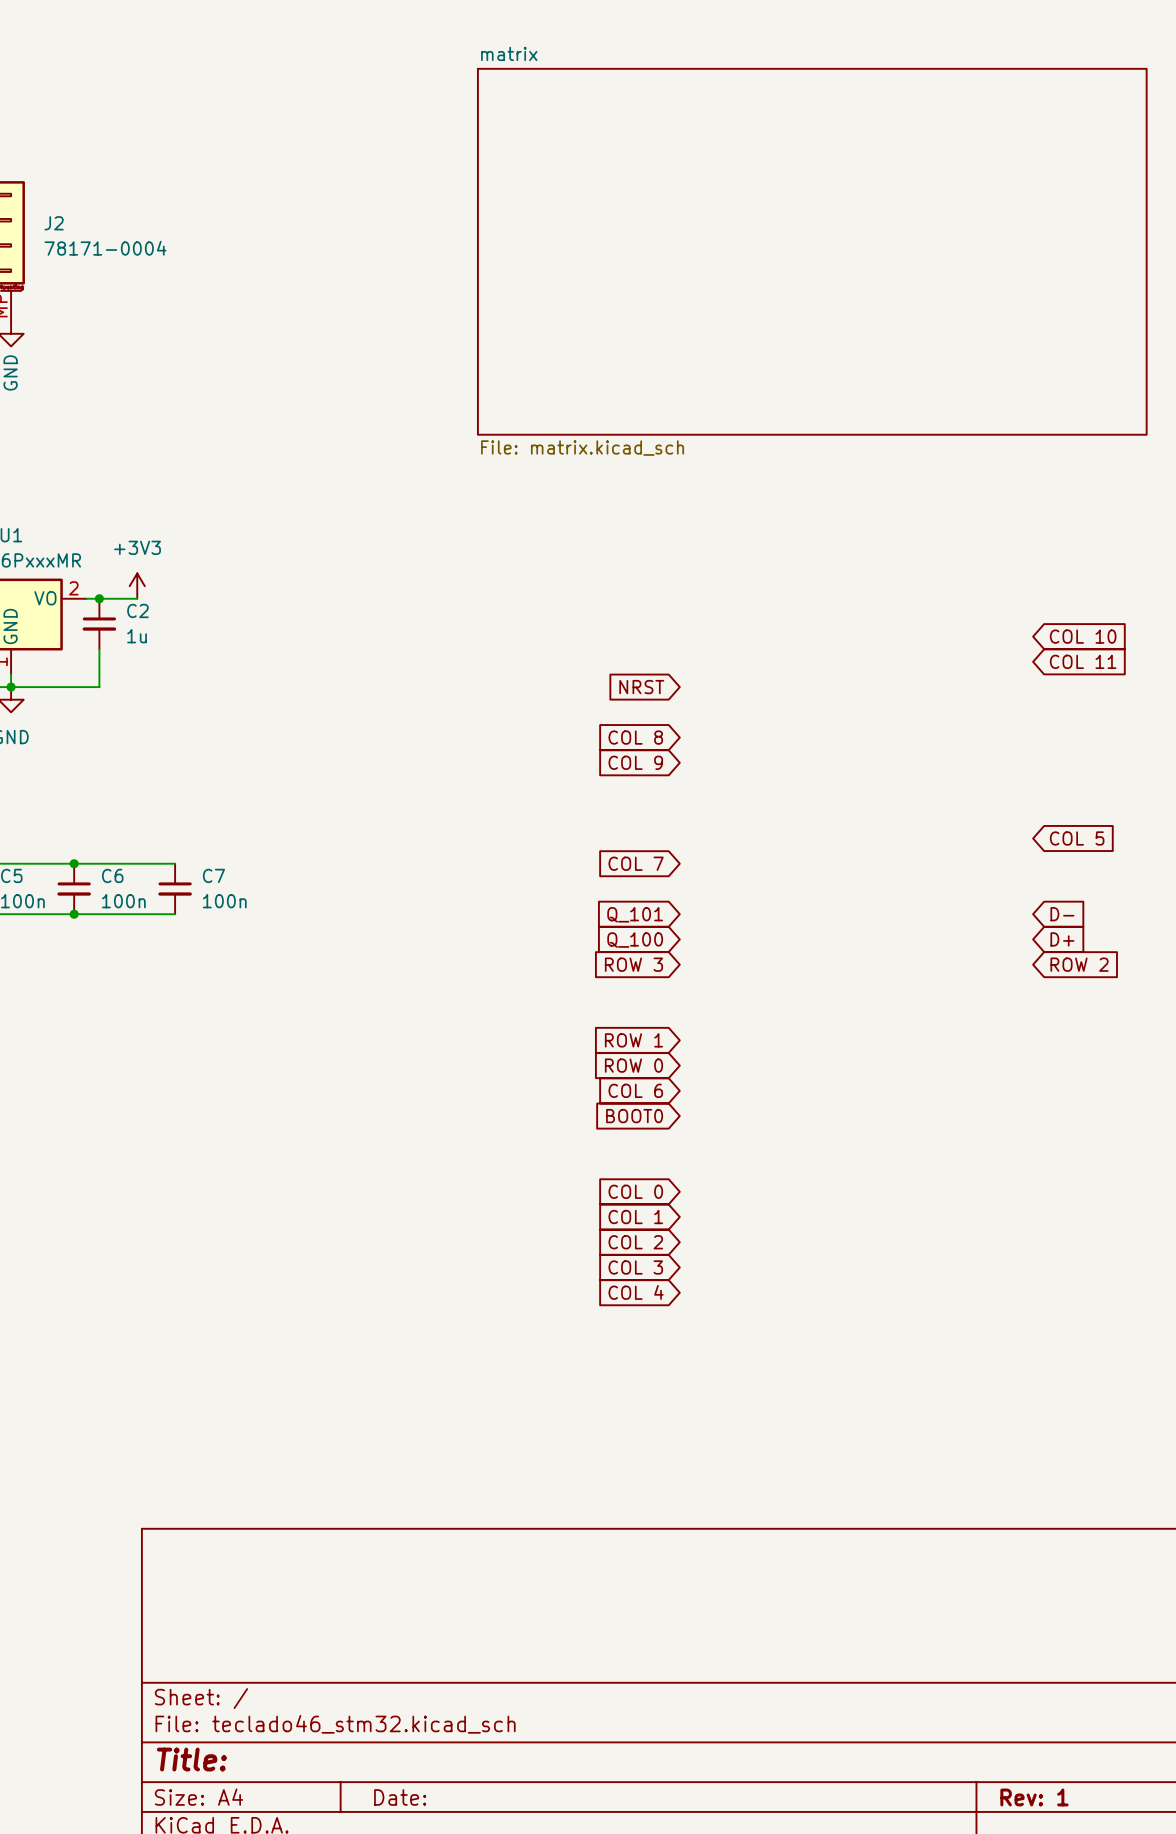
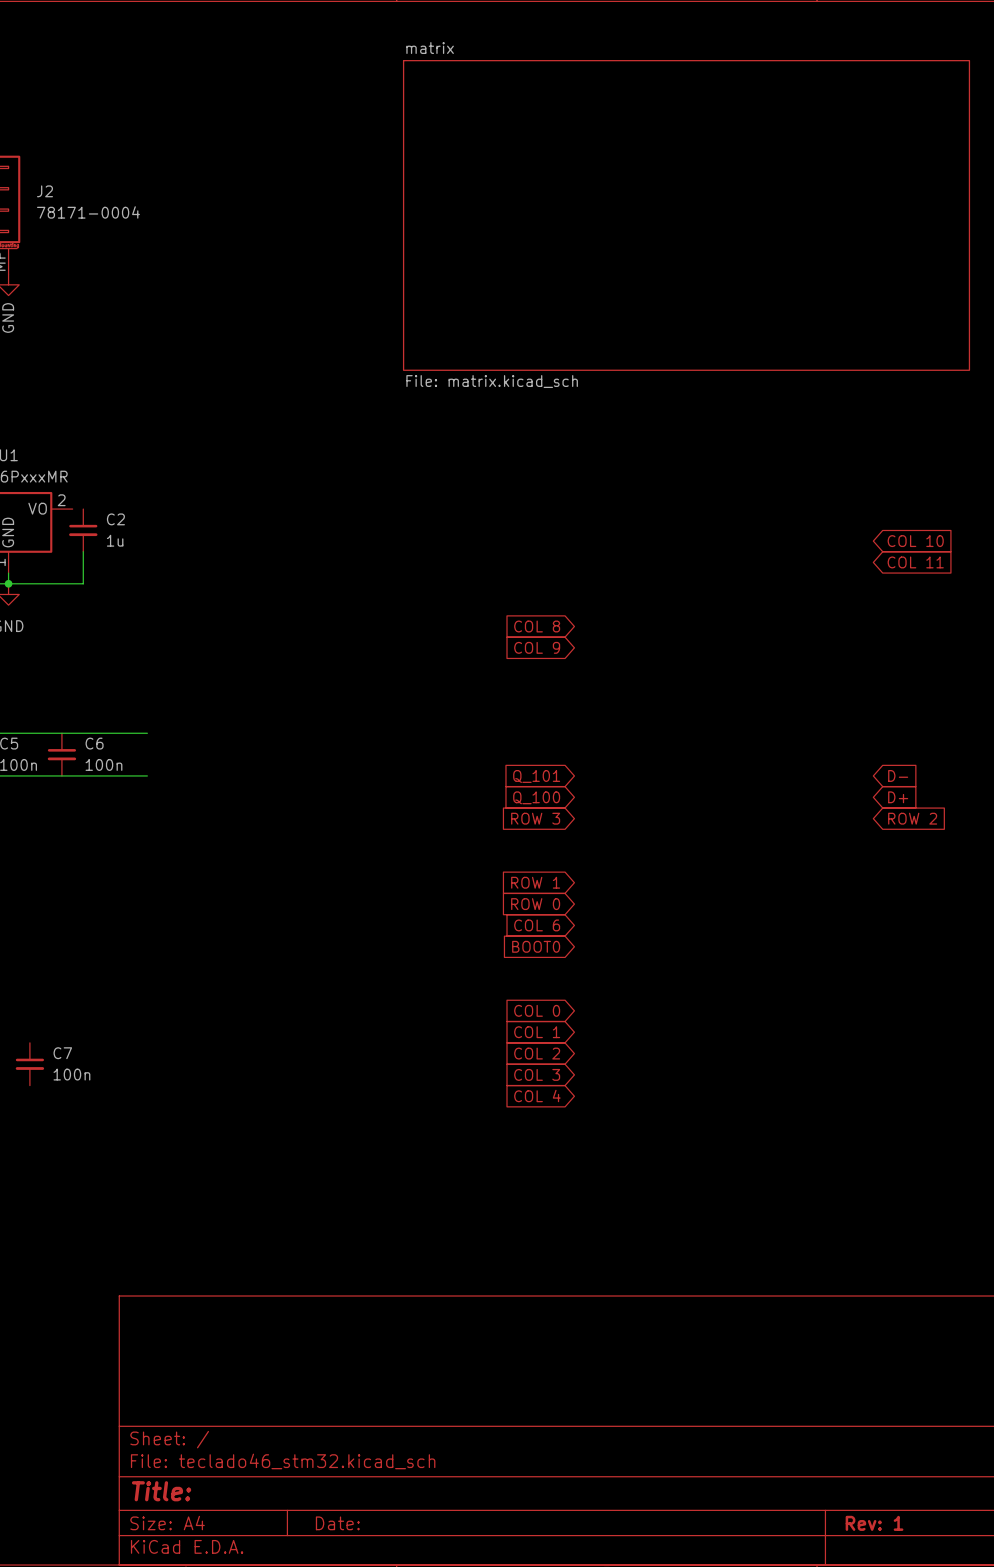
power symbol: +3V3 (137, 586) -> none
wire: (86, 598) (137, 598) -> none
junction: (99, 598) -> none
global label: NRST (641, 687) -> none
global label: COL 5 (1077, 838) -> none
junction: (74, 863) -> none
global label: COL 7 (636, 863) -> none
C7 position: (175, 888) -> (29, 1064)
junction: (74, 914) -> none

